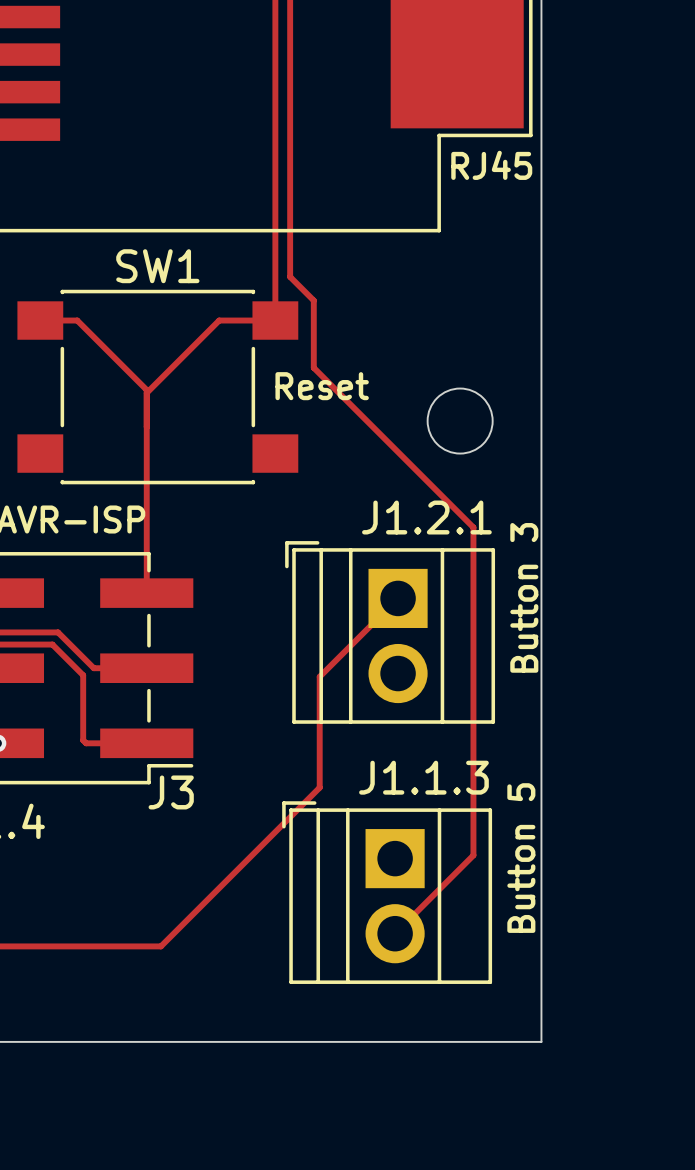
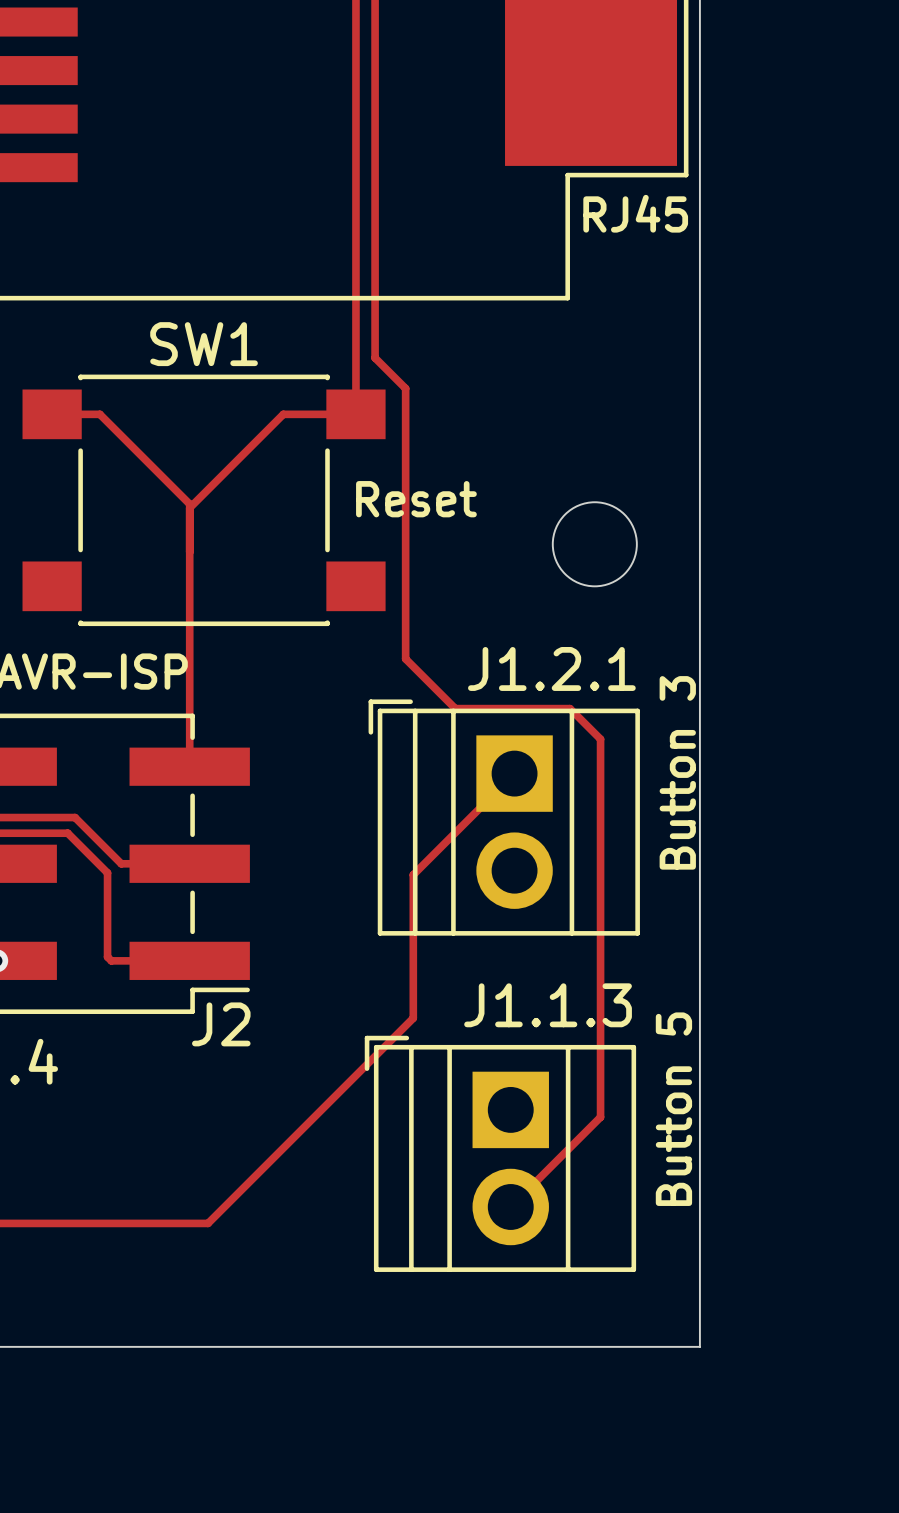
track: (313, 367) (473, 527) (473, 855) (464, 864) -> (405, 475) (405, 658) (455, 708) (569, 708) (600, 739) (600, 1117)
J3 name: J3 (171, 792) -> J2 (221, 1024)

